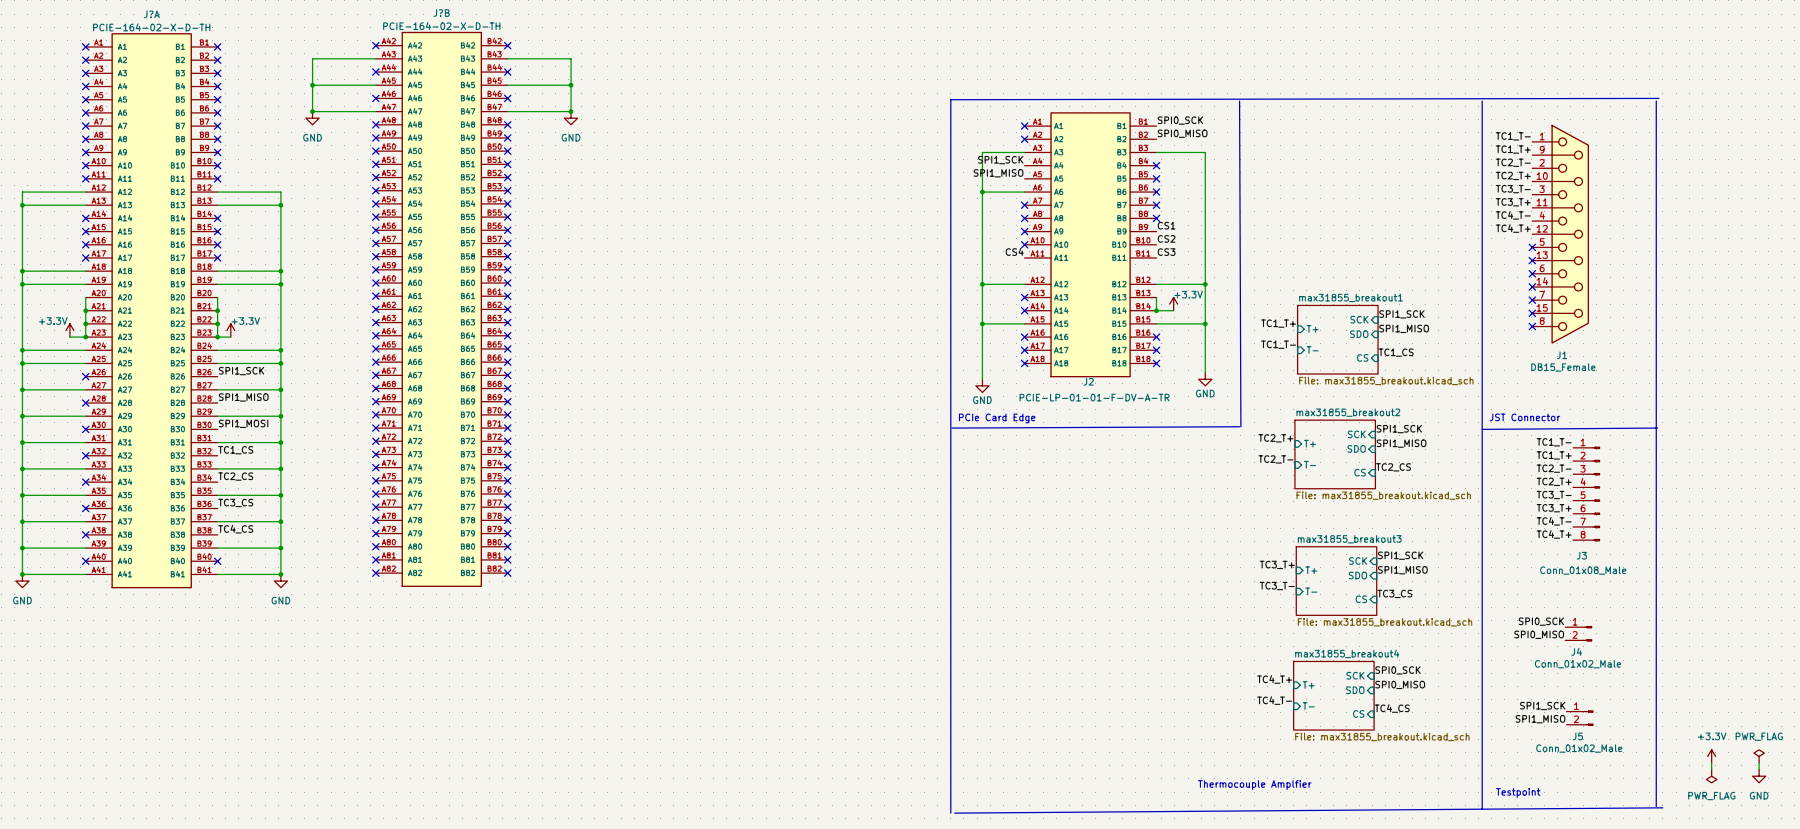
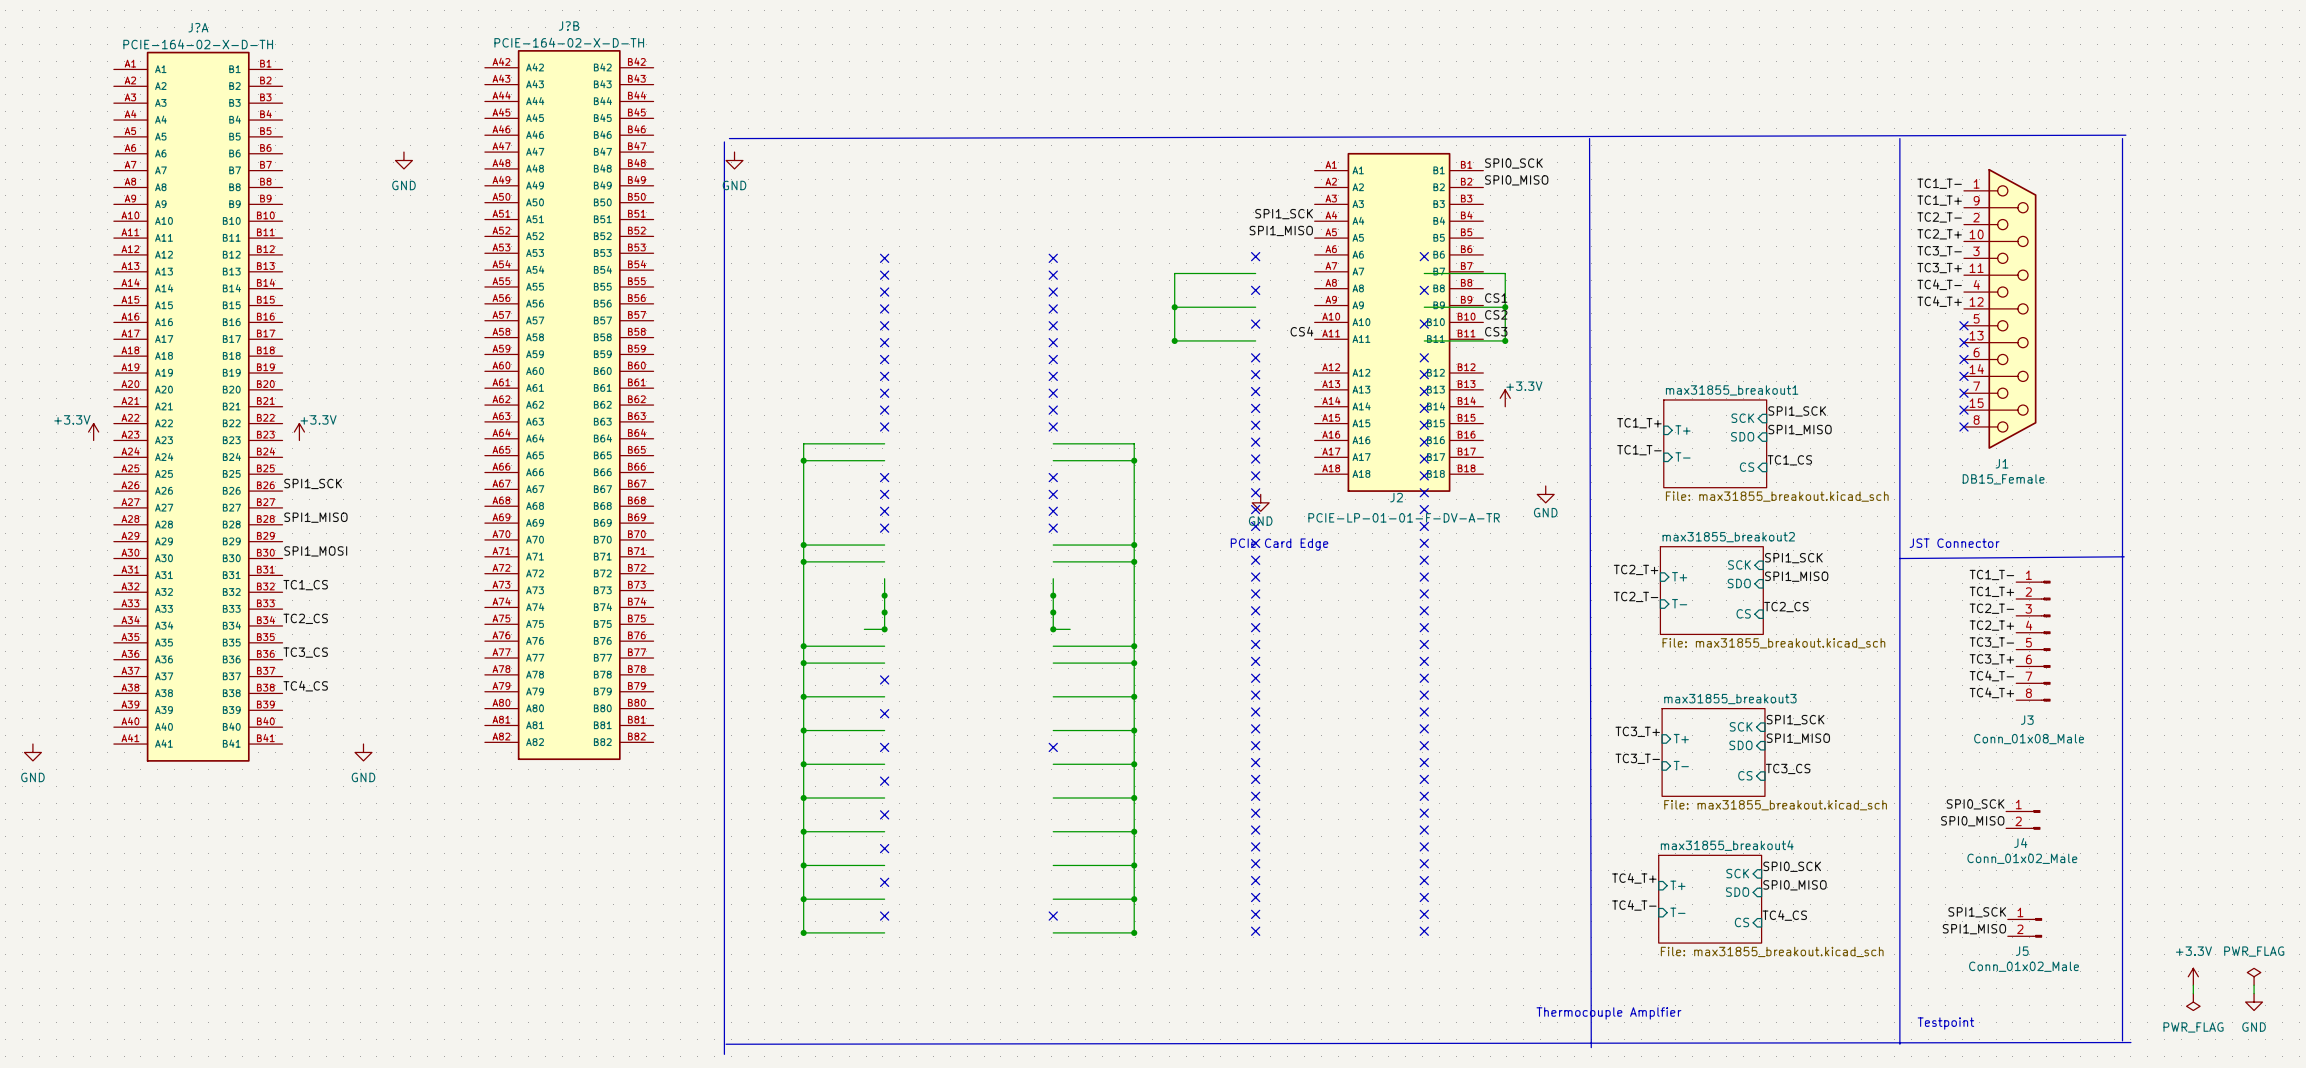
no-connect mark: (375, 45) -> none
no-connect mark: (507, 45) -> none
no-connect mark: (85, 46) -> none
no-connect mark: (217, 46) -> none
wire: (375, 58) (312, 58) (312, 111) (375, 111) -> none
wire: (507, 58) (571, 58) (571, 111) (507, 111) -> none
no-connect mark: (85, 60) -> none
no-connect mark: (217, 60) -> none
no-connect mark: (375, 72) -> none
no-connect mark: (507, 72) -> none
no-connect mark: (85, 73) -> none
no-connect mark: (217, 73) -> none
wire: (312, 85) (375, 85) -> none
junction: (312, 85) -> none
wire: (507, 85) (571, 85) -> none
junction: (571, 85) -> none
no-connect mark: (85, 86) -> none
no-connect mark: (217, 86) -> none
no-connect mark: (375, 98) -> none
no-connect mark: (507, 98) -> none
line: (1658, 98) (950, 99) (950, 813) -> (2125, 135) (729, 138)
no-connect mark: (85, 99) -> none
no-connect mark: (217, 99) -> none
line: (1239, 101) (1240, 426) -> (1589, 138) (1591, 1047)
line: none -> (724, 141) (724, 1054)
junction: (312, 111) -> none
junction: (571, 111) -> none
no-connect mark: (85, 112) -> none
no-connect mark: (217, 112) -> none
no-connect mark: (375, 124) -> none
no-connect mark: (507, 124) -> none
no-connect mark: (85, 126) -> none
no-connect mark: (217, 126) -> none
no-connect mark: (1024, 126) -> none
no-connect mark: (375, 137) -> none
no-connect mark: (507, 137) -> none
no-connect mark: (85, 139) -> none
no-connect mark: (217, 139) -> none
no-connect mark: (1024, 139) -> none
no-connect mark: (375, 151) -> none
no-connect mark: (507, 151) -> none
no-connect mark: (85, 152) -> none
no-connect mark: (217, 152) -> none
wire: (1024, 152) (982, 152) (982, 379) -> none
wire: (1156, 152) (1205, 152) (1205, 372) -> none
no-connect mark: (375, 164) -> none
no-connect mark: (507, 164) -> none
no-connect mark: (85, 165) -> none
no-connect mark: (217, 165) -> none
no-connect mark: (1156, 165) -> none
no-connect mark: (375, 177) -> none
no-connect mark: (507, 177) -> none
no-connect mark: (85, 178) -> none
no-connect mark: (217, 178) -> none
no-connect mark: (1156, 178) -> none
no-connect mark: (375, 190) -> none
no-connect mark: (507, 190) -> none
wire: (85, 192) (22, 192) (22, 574) (85, 574) -> none
wire: (217, 192) (280, 192) (280, 574) (217, 574) -> none
wire: (982, 192) (1024, 192) -> none
junction: (982, 192) -> none
no-connect mark: (1156, 192) -> none
no-connect mark: none -> (1255, 256)
no-connect mark: none -> (1424, 256)
no-connect mark: none -> (884, 258)
no-connect mark: none -> (1053, 258)
no-connect mark: (375, 203) -> none
no-connect mark: (507, 203) -> none
wire: (22, 205) (85, 205) -> none
junction: (22, 205) -> none
wire: (217, 205) (280, 205) -> none
junction: (280, 205) -> none
no-connect mark: (1024, 205) -> none
no-connect mark: (1156, 205) -> none
wire: none -> (1255, 273) (1174, 273) (1174, 340) (1255, 340)
wire: none -> (1424, 273) (1505, 273) (1505, 340) (1424, 340)
no-connect mark: none -> (884, 275)
no-connect mark: none -> (1053, 275)
no-connect mark: (375, 217) -> none
no-connect mark: (507, 217) -> none
no-connect mark: (85, 218) -> none
no-connect mark: (217, 218) -> none
no-connect mark: (1024, 218) -> none
no-connect mark: (1156, 218) -> none
no-connect mark: none -> (1255, 290)
no-connect mark: none -> (1424, 290)
no-connect mark: none -> (884, 292)
no-connect mark: none -> (1053, 292)
no-connect mark: (375, 230) -> none
no-connect mark: (507, 230) -> none
no-connect mark: (85, 231) -> none
no-connect mark: (217, 231) -> none
no-connect mark: (1024, 231) -> none
wire: none -> (1174, 307) (1255, 307)
junction: none -> (1174, 307)
wire: none -> (1424, 307) (1505, 307)
junction: none -> (1505, 307)
no-connect mark: none -> (884, 308)
no-connect mark: none -> (1053, 308)
no-connect mark: (375, 243) -> none
no-connect mark: (507, 243) -> none
no-connect mark: (85, 244) -> none
no-connect mark: (217, 244) -> none
no-connect mark: (1024, 244) -> none
no-connect mark: none -> (1255, 324)
no-connect mark: none -> (1424, 324)
no-connect mark: none -> (884, 325)
no-connect mark: none -> (1053, 325)
no-connect mark: (375, 256) -> none
no-connect mark: (507, 256) -> none
no-connect mark: (85, 257) -> none
no-connect mark: (217, 257) -> none
junction: none -> (1174, 340)
junction: none -> (1505, 340)
no-connect mark: none -> (884, 342)
no-connect mark: none -> (1053, 342)
no-connect mark: (375, 269) -> none
no-connect mark: (507, 269) -> none
wire: (22, 271) (85, 271) -> none
junction: (22, 271) -> none
wire: (217, 271) (280, 271) -> none
junction: (280, 271) -> none
no-connect mark: none -> (1255, 357)
no-connect mark: none -> (1424, 357)
no-connect mark: none -> (884, 359)
no-connect mark: none -> (1053, 359)
no-connect mark: (375, 283) -> none
no-connect mark: (507, 283) -> none
wire: (22, 284) (85, 284) -> none
junction: (22, 284) -> none
wire: (217, 284) (280, 284) -> none
junction: (280, 284) -> none
wire: (982, 284) (1024, 284) -> none
junction: (982, 284) -> none
wire: (1156, 284) (1205, 284) -> none
junction: (1205, 284) -> none
no-connect mark: none -> (1255, 374)
no-connect mark: none -> (1424, 374)
no-connect mark: none -> (884, 376)
no-connect mark: none -> (1053, 376)
no-connect mark: (375, 296) -> none
no-connect mark: (507, 296) -> none
wire: (85, 297) (85, 337) (69, 337) -> none
wire: (217, 297) (217, 337) (230, 337) -> none
no-connect mark: (1024, 297) -> none
wire: (1156, 297) (1156, 310) (1173, 310) -> none
no-connect mark: none -> (1255, 391)
no-connect mark: none -> (1424, 391)
no-connect mark: none -> (884, 393)
no-connect mark: none -> (1053, 393)
no-connect mark: (375, 309) -> none
no-connect mark: (507, 309) -> none
junction: (85, 310) -> none
junction: (217, 310) -> none
no-connect mark: (1024, 310) -> none
junction: (1156, 310) -> none
no-connect mark: none -> (1255, 408)
no-connect mark: none -> (1424, 408)
no-connect mark: none -> (884, 410)
no-connect mark: none -> (1053, 410)
no-connect mark: (375, 322) -> none
no-connect mark: (507, 322) -> none
junction: (85, 323) -> none
junction: (217, 323) -> none
wire: (982, 323) (1024, 323) -> none
junction: (982, 323) -> none
wire: (1156, 323) (1205, 323) -> none
junction: (1205, 323) -> none
no-connect mark: none -> (1255, 425)
no-connect mark: none -> (1424, 425)
no-connect mark: none -> (884, 426)
no-connect mark: none -> (1053, 426)
no-connect mark: (375, 335) -> none
no-connect mark: (507, 335) -> none
junction: (85, 337) -> none
junction: (217, 337) -> none
no-connect mark: (1024, 337) -> none
no-connect mark: (1156, 337) -> none
no-connect mark: none -> (1255, 442)
no-connect mark: none -> (1424, 442)
wire: none -> (884, 443) (803, 443) (803, 932) (884, 932)
wire: none -> (1053, 443) (1134, 443) (1134, 932) (1053, 932)
no-connect mark: (375, 348) -> none
no-connect mark: (507, 348) -> none
wire: (22, 350) (85, 350) -> none
junction: (22, 350) -> none
wire: (217, 350) (280, 350) -> none
junction: (280, 350) -> none
no-connect mark: (1024, 350) -> none
no-connect mark: (1156, 350) -> none
no-connect mark: none -> (1255, 459)
no-connect mark: none -> (1424, 459)
wire: none -> (803, 460) (884, 460)
junction: none -> (803, 460)
wire: none -> (1053, 460) (1134, 460)
junction: none -> (1134, 460)
no-connect mark: (375, 362) -> none
no-connect mark: (507, 362) -> none
wire: (22, 363) (85, 363) -> none
junction: (22, 363) -> none
wire: (217, 363) (280, 363) -> none
junction: (280, 363) -> none
no-connect mark: (1024, 363) -> none
no-connect mark: (1156, 363) -> none
no-connect mark: none -> (1255, 475)
no-connect mark: none -> (1424, 475)
no-connect mark: none -> (884, 477)
no-connect mark: none -> (1053, 477)
no-connect mark: (375, 375) -> none
no-connect mark: (507, 375) -> none
no-connect mark: (85, 376) -> none
no-connect mark: none -> (1255, 492)
no-connect mark: none -> (1424, 492)
no-connect mark: none -> (884, 494)
no-connect mark: none -> (1053, 494)
no-connect mark: (375, 388) -> none
no-connect mark: (507, 388) -> none
wire: (22, 389) (85, 389) -> none
junction: (22, 389) -> none
wire: (217, 389) (280, 389) -> none
junction: (280, 389) -> none
no-connect mark: none -> (1255, 509)
no-connect mark: none -> (1424, 509)
no-connect mark: none -> (884, 511)
no-connect mark: none -> (1053, 511)
no-connect mark: (375, 401) -> none
no-connect mark: (507, 401) -> none
no-connect mark: (85, 403) -> none
no-connect mark: none -> (1255, 526)
no-connect mark: none -> (1424, 526)
no-connect mark: none -> (884, 528)
no-connect mark: none -> (1053, 528)
no-connect mark: (375, 414) -> none
no-connect mark: (507, 414) -> none
wire: (22, 416) (85, 416) -> none
junction: (22, 416) -> none
wire: (217, 416) (280, 416) -> none
junction: (280, 416) -> none
no-connect mark: none -> (1255, 543)
no-connect mark: none -> (1424, 543)
wire: none -> (803, 545) (884, 545)
junction: none -> (803, 545)
wire: none -> (1053, 545) (1134, 545)
junction: none -> (1134, 545)
line: (1239, 426) (952, 428) -> none
no-connect mark: (375, 428) -> none
no-connect mark: (507, 428) -> none
no-connect mark: (85, 429) -> none
no-connect mark: none -> (1255, 560)
no-connect mark: none -> (1424, 560)
wire: none -> (803, 561) (884, 561)
junction: none -> (803, 561)
wire: none -> (1053, 561) (1134, 561)
junction: none -> (1134, 561)
no-connect mark: (375, 441) -> none
no-connect mark: (507, 441) -> none
wire: (22, 442) (85, 442) -> none
junction: (22, 442) -> none
wire: (217, 442) (280, 442) -> none
junction: (280, 442) -> none
no-connect mark: none -> (1255, 577)
no-connect mark: none -> (1424, 577)
wire: none -> (884, 578) (884, 629) (864, 629)
wire: none -> (1053, 578) (1053, 629) (1070, 629)
no-connect mark: (375, 454) -> none
no-connect mark: (507, 454) -> none
no-connect mark: (85, 455) -> none
no-connect mark: none -> (1255, 593)
no-connect mark: none -> (1424, 593)
junction: none -> (884, 595)
junction: none -> (1053, 595)
no-connect mark: (375, 467) -> none
no-connect mark: (507, 467) -> none
wire: (22, 468) (85, 468) -> none
junction: (22, 468) -> none
wire: (217, 468) (280, 468) -> none
junction: (280, 468) -> none
no-connect mark: none -> (1255, 610)
no-connect mark: none -> (1424, 610)
junction: none -> (884, 612)
junction: none -> (1053, 612)
no-connect mark: (375, 480) -> none
no-connect mark: (507, 480) -> none
no-connect mark: (85, 482) -> none
no-connect mark: none -> (1255, 627)
no-connect mark: none -> (1424, 627)
junction: none -> (884, 629)
junction: none -> (1053, 629)
no-connect mark: (375, 494) -> none
no-connect mark: (507, 494) -> none
wire: (22, 495) (85, 495) -> none
junction: (22, 495) -> none
wire: (217, 495) (280, 495) -> none
junction: (280, 495) -> none
no-connect mark: none -> (1255, 644)
no-connect mark: none -> (1424, 644)
wire: none -> (803, 646) (884, 646)
junction: none -> (803, 646)
wire: none -> (1053, 646) (1134, 646)
junction: none -> (1134, 646)
no-connect mark: (375, 507) -> none
no-connect mark: (507, 507) -> none
no-connect mark: (85, 508) -> none
no-connect mark: none -> (1255, 661)
no-connect mark: none -> (1424, 661)
wire: none -> (803, 663) (884, 663)
junction: none -> (803, 663)
wire: none -> (1053, 663) (1134, 663)
junction: none -> (1134, 663)
no-connect mark: (375, 520) -> none
no-connect mark: (507, 520) -> none
wire: (22, 521) (85, 521) -> none
junction: (22, 521) -> none
wire: (217, 521) (280, 521) -> none
junction: (280, 521) -> none
no-connect mark: none -> (1255, 678)
no-connect mark: none -> (1424, 678)
no-connect mark: none -> (884, 679)
no-connect mark: (375, 533) -> none
no-connect mark: (507, 533) -> none
no-connect mark: (85, 534) -> none
no-connect mark: none -> (1255, 695)
no-connect mark: none -> (1424, 695)
wire: none -> (803, 696) (884, 696)
junction: none -> (803, 696)
wire: none -> (1053, 696) (1134, 696)
junction: none -> (1134, 696)
no-connect mark: (375, 546) -> none
no-connect mark: (507, 546) -> none
wire: (22, 548) (85, 548) -> none
junction: (22, 548) -> none
wire: (217, 548) (280, 548) -> none
junction: (280, 548) -> none
no-connect mark: none -> (1255, 711)
no-connect mark: none -> (1424, 711)
no-connect mark: none -> (884, 713)
no-connect mark: (375, 559) -> none
no-connect mark: (507, 559) -> none
no-connect mark: (85, 561) -> none
no-connect mark: (217, 561) -> none
no-connect mark: none -> (1255, 728)
no-connect mark: none -> (1424, 728)
wire: none -> (803, 730) (884, 730)
junction: none -> (803, 730)
wire: none -> (1053, 730) (1134, 730)
junction: none -> (1134, 730)
no-connect mark: (375, 573) -> none
no-connect mark: (507, 573) -> none
junction: (22, 574) -> none
junction: (280, 574) -> none
no-connect mark: none -> (1255, 745)
no-connect mark: none -> (1424, 745)
no-connect mark: none -> (884, 747)
no-connect mark: none -> (1053, 747)
no-connect mark: none -> (1255, 762)
no-connect mark: none -> (1424, 762)
wire: none -> (803, 764) (884, 764)
junction: none -> (803, 764)
wire: none -> (1053, 764) (1134, 764)
junction: none -> (1134, 764)
no-connect mark: none -> (1255, 779)
no-connect mark: none -> (1424, 779)
no-connect mark: none -> (884, 781)
no-connect mark: none -> (1255, 796)
no-connect mark: none -> (1424, 796)
wire: none -> (803, 798) (884, 798)
junction: none -> (803, 798)
wire: none -> (1053, 798) (1134, 798)
junction: none -> (1134, 798)
no-connect mark: none -> (1255, 813)
no-connect mark: none -> (1424, 813)
no-connect mark: none -> (884, 814)
no-connect mark: none -> (1255, 830)
no-connect mark: none -> (1424, 830)
wire: none -> (803, 831) (884, 831)
junction: none -> (803, 831)
wire: none -> (1053, 831) (1134, 831)
junction: none -> (1134, 831)
no-connect mark: none -> (1255, 846)
no-connect mark: none -> (1424, 846)
no-connect mark: none -> (884, 848)
no-connect mark: none -> (1255, 863)
no-connect mark: none -> (1424, 863)
wire: none -> (803, 865) (884, 865)
junction: none -> (803, 865)
wire: none -> (1053, 865) (1134, 865)
junction: none -> (1134, 865)
no-connect mark: none -> (1255, 880)
no-connect mark: none -> (1424, 880)
no-connect mark: none -> (884, 882)
no-connect mark: none -> (1255, 897)
no-connect mark: none -> (1424, 897)
wire: none -> (803, 899) (884, 899)
junction: none -> (803, 899)
wire: none -> (1053, 899) (1134, 899)
junction: none -> (1134, 899)
no-connect mark: none -> (1255, 914)
no-connect mark: none -> (1424, 914)
no-connect mark: none -> (884, 916)
no-connect mark: none -> (1053, 916)
no-connect mark: none -> (1255, 931)
no-connect mark: none -> (1424, 931)
junction: none -> (803, 932)
junction: none -> (1134, 932)
line: (1662, 807) (954, 813) -> (2130, 1042) (726, 1044)

